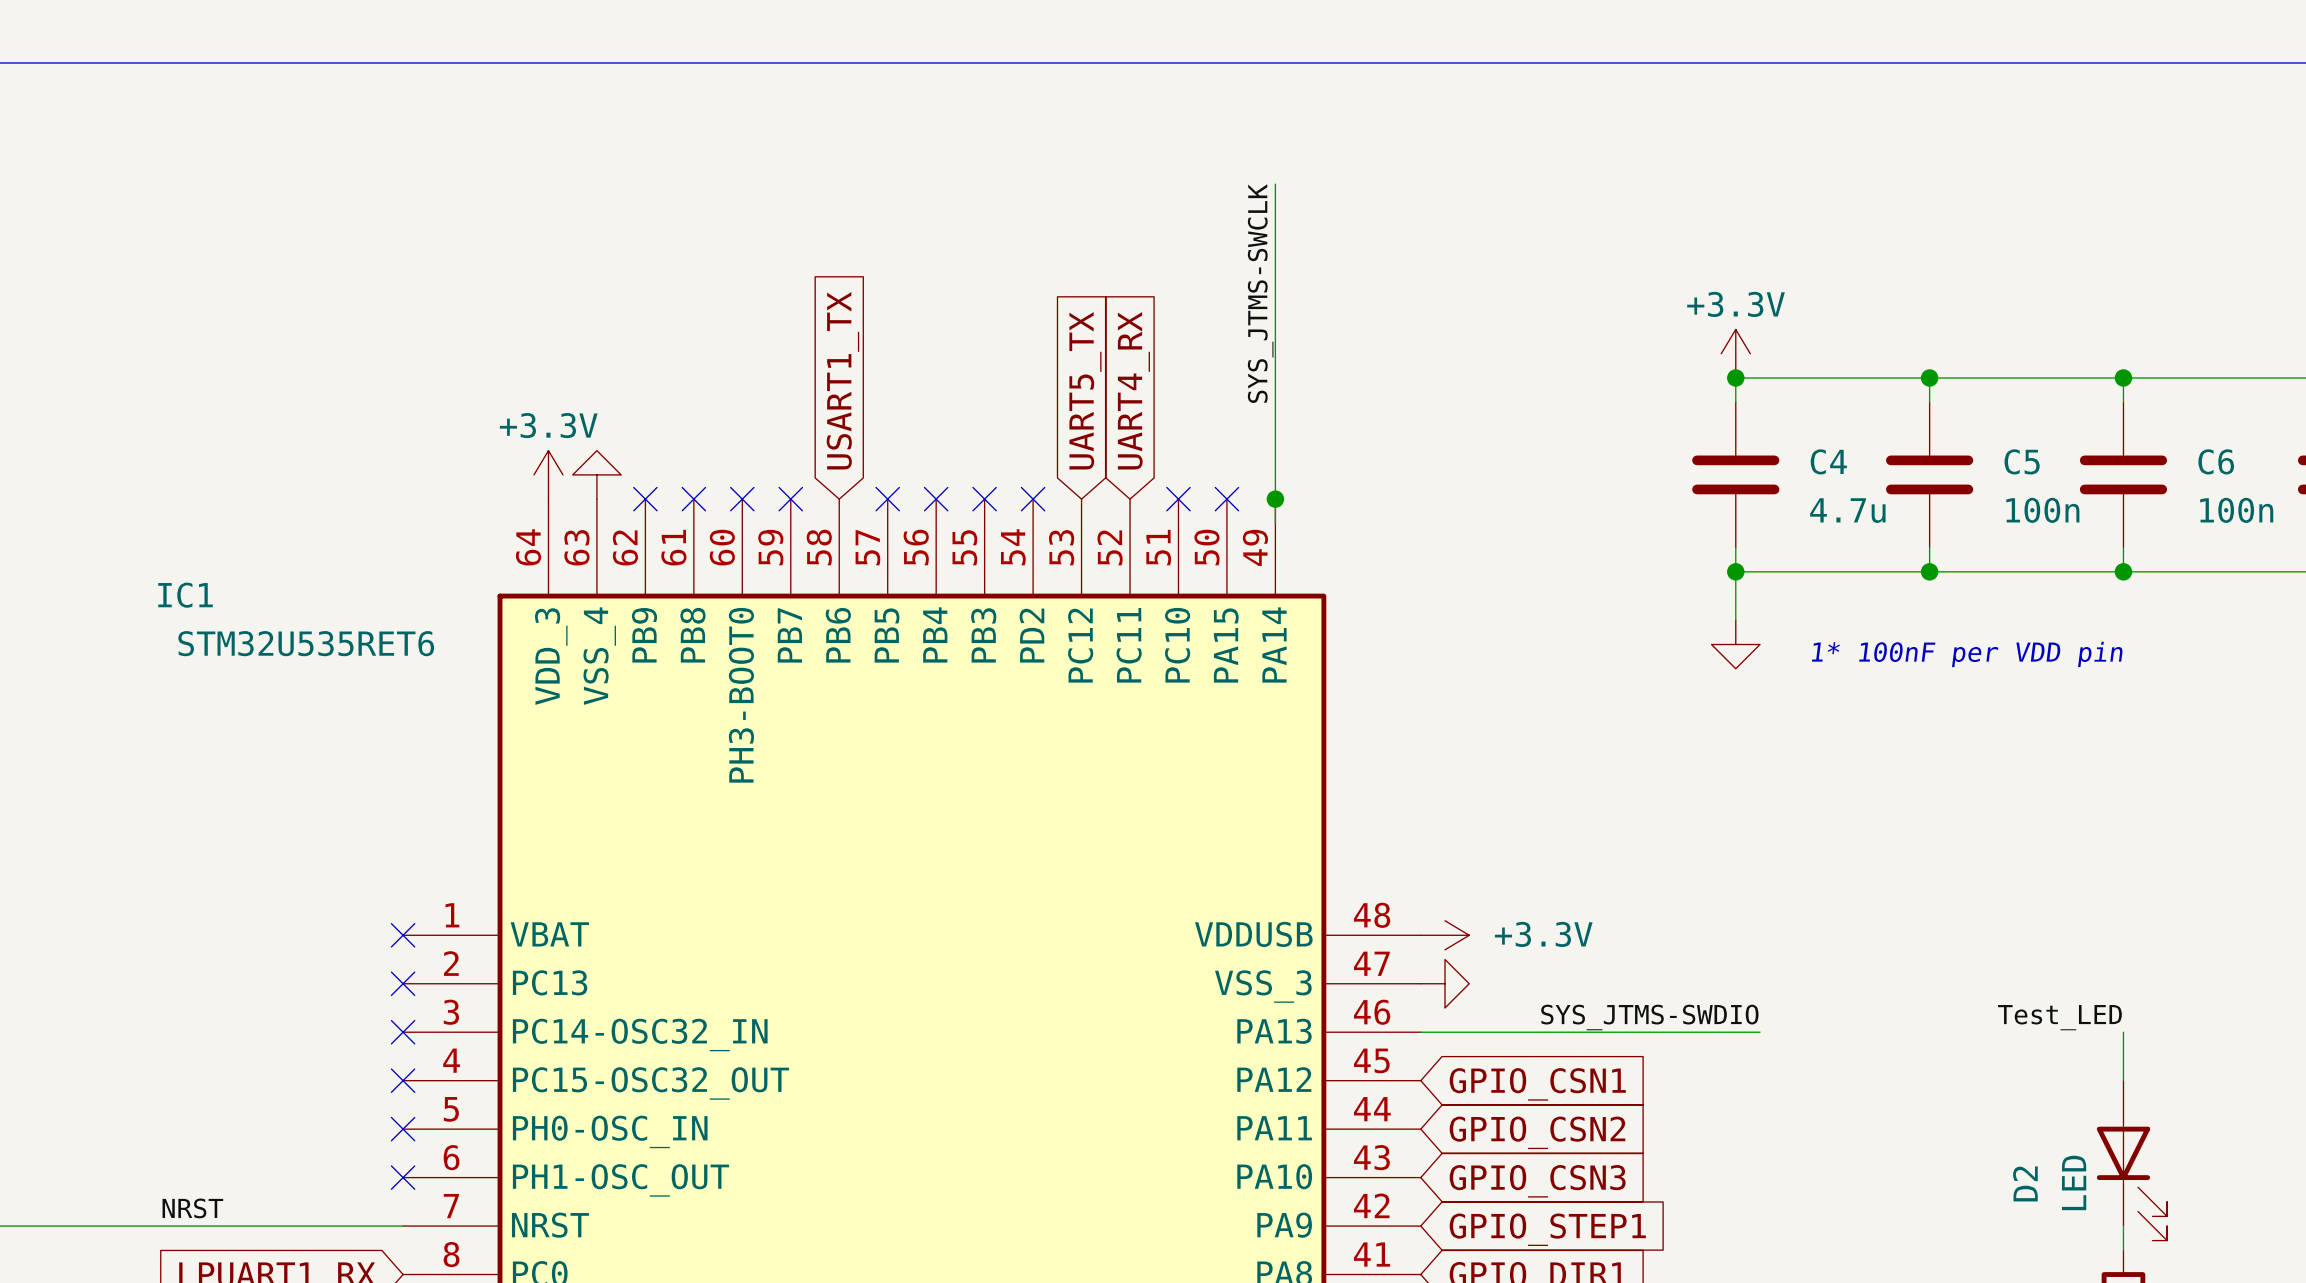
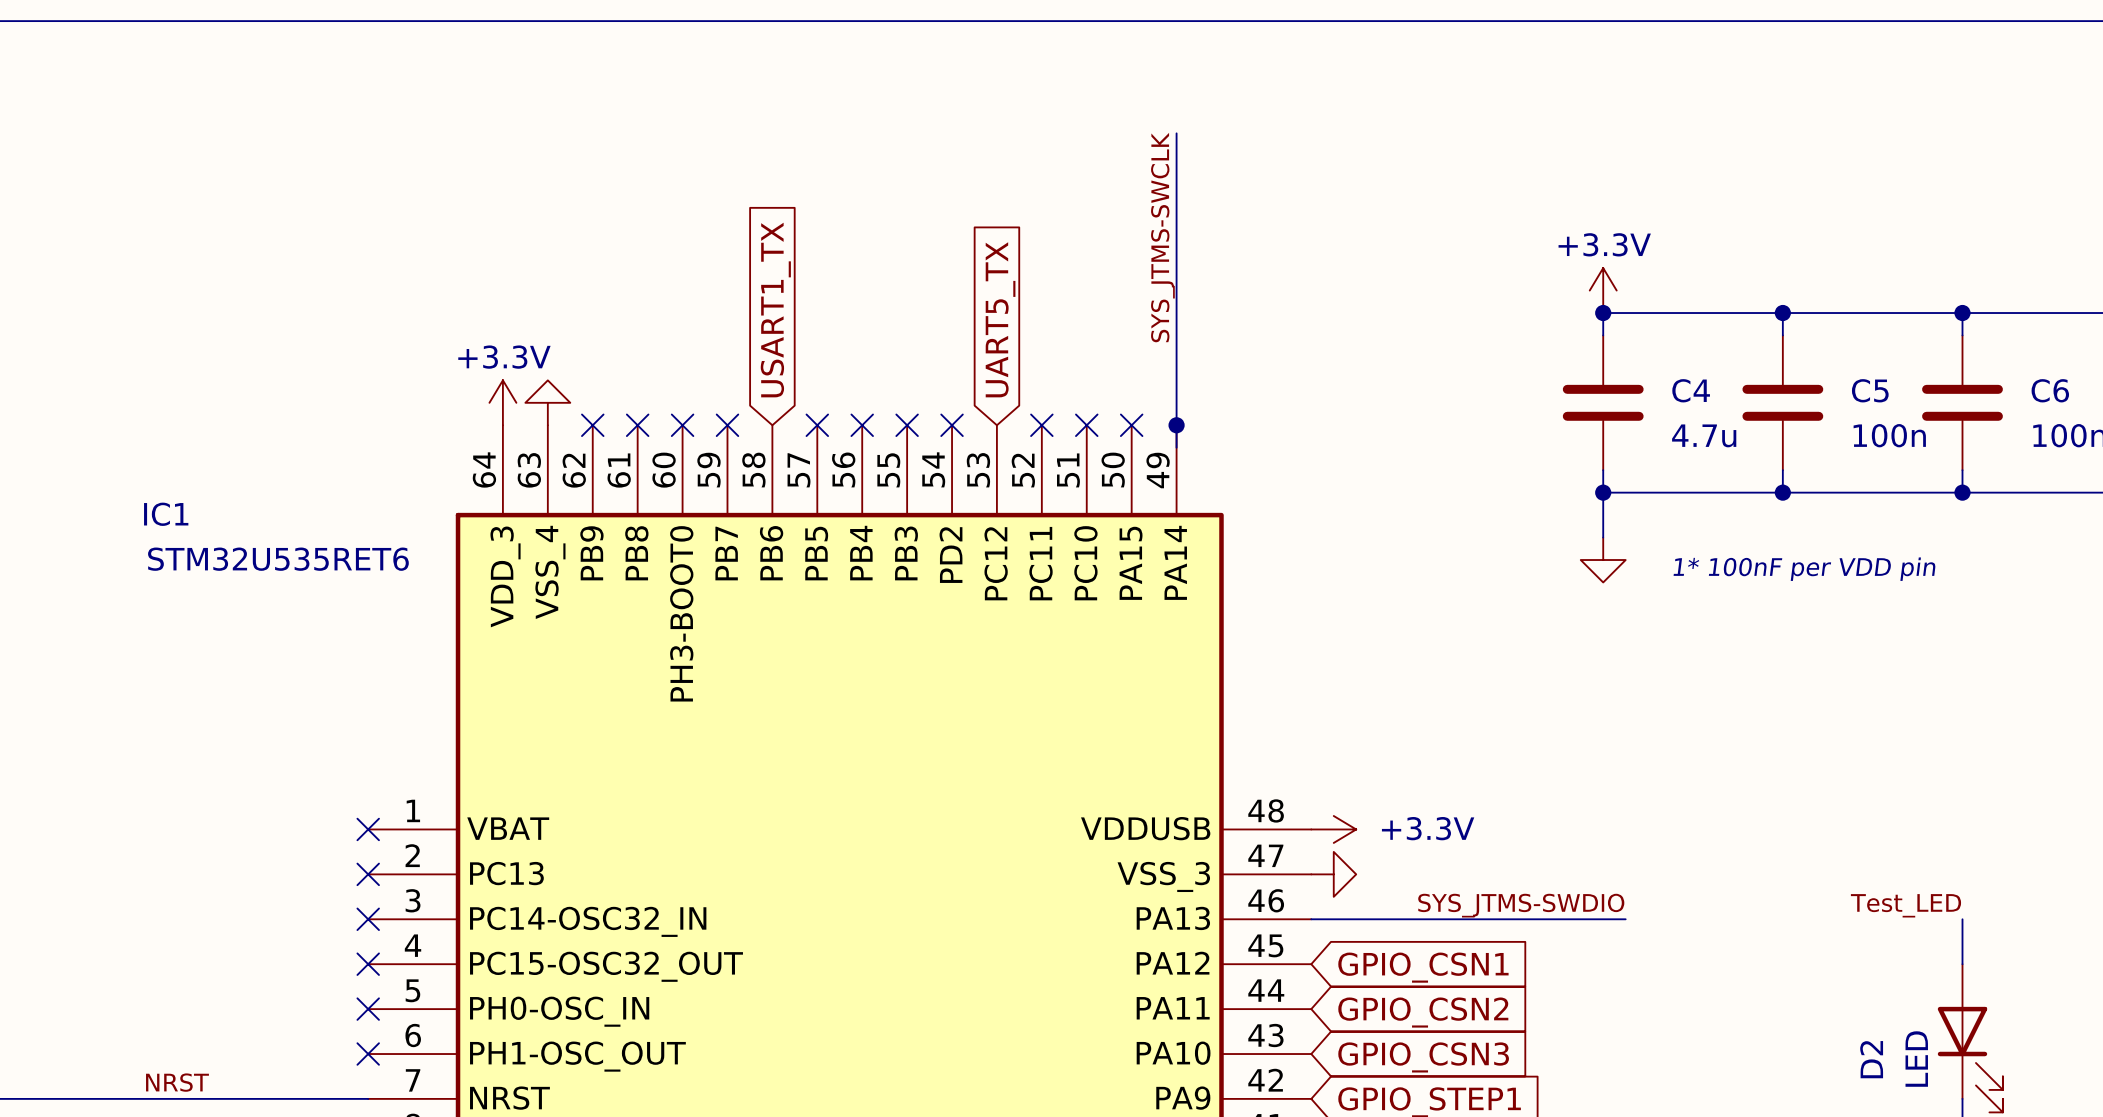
global label: UART4_RX (1133, 390) -> none
no-connect mark: none -> (1041, 425)

